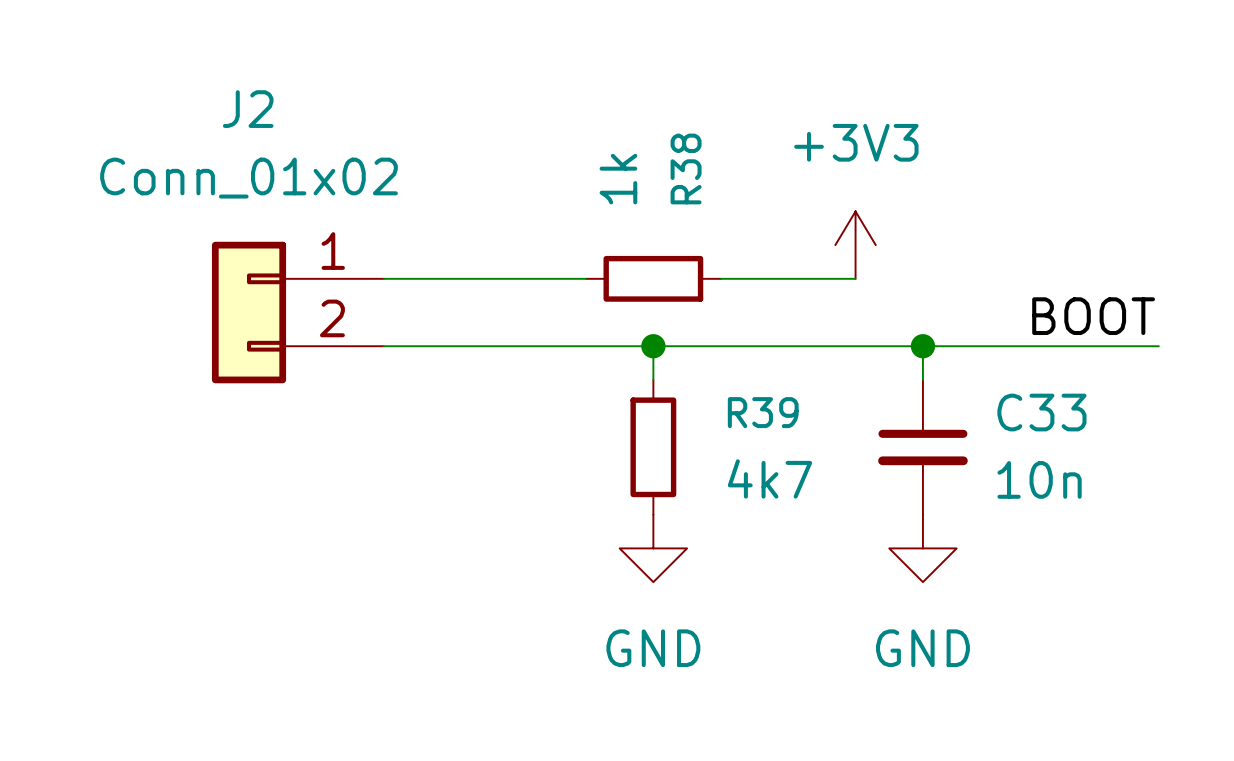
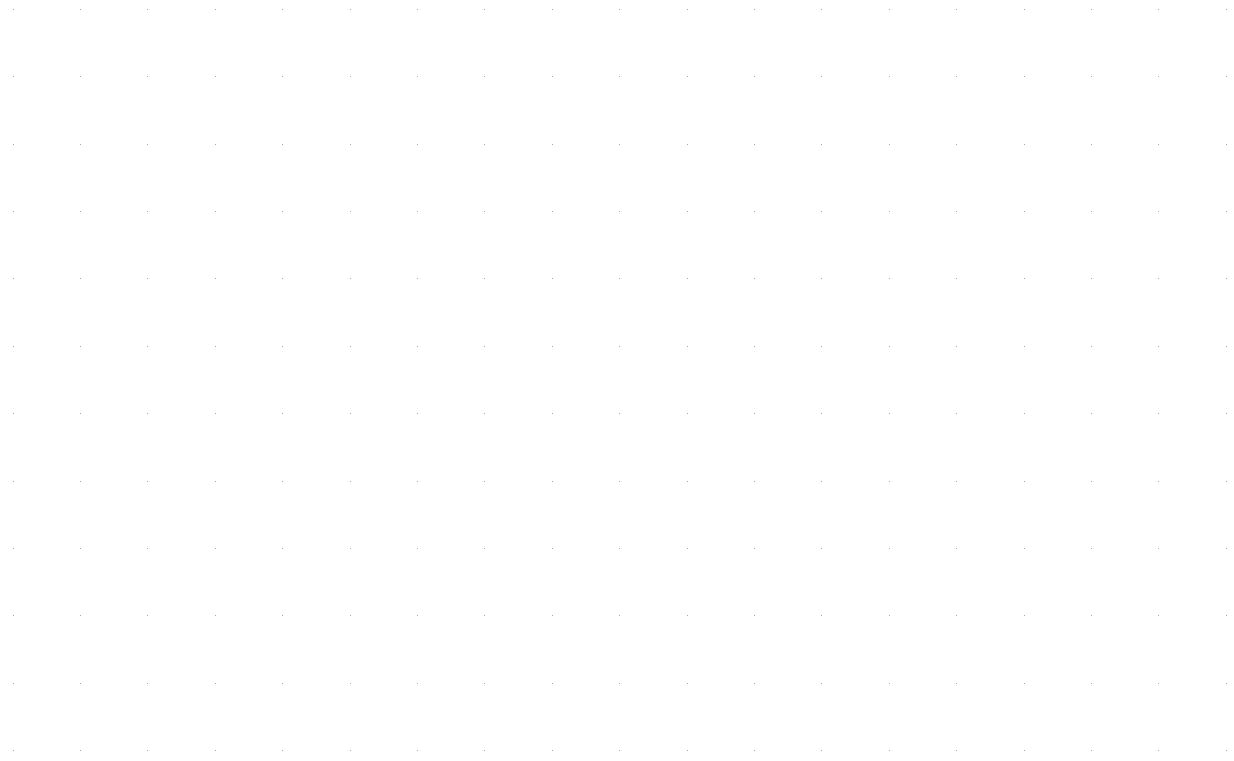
power symbol: +3V3 (855, 245) -> none
wire: (383, 278) (585, 278) -> none
R38: 1k (653, 278) -> none
wire: (720, 278) (855, 278) -> none
J2: Conn_01x02 (297, 312) -> none
label: BOOT (1093, 316) -> none
wire: (383, 346) (1158, 346) -> none
wire: (653, 346) (653, 379) -> none
junction: (653, 346) -> none
wire: (922, 346) (922, 379) -> none
junction: (922, 346) -> none
R39: 4k7 (653, 447) -> none
C33: 10n (922, 447) -> none
power symbol: GND (653, 548) -> none
power symbol: GND (922, 548) -> none

